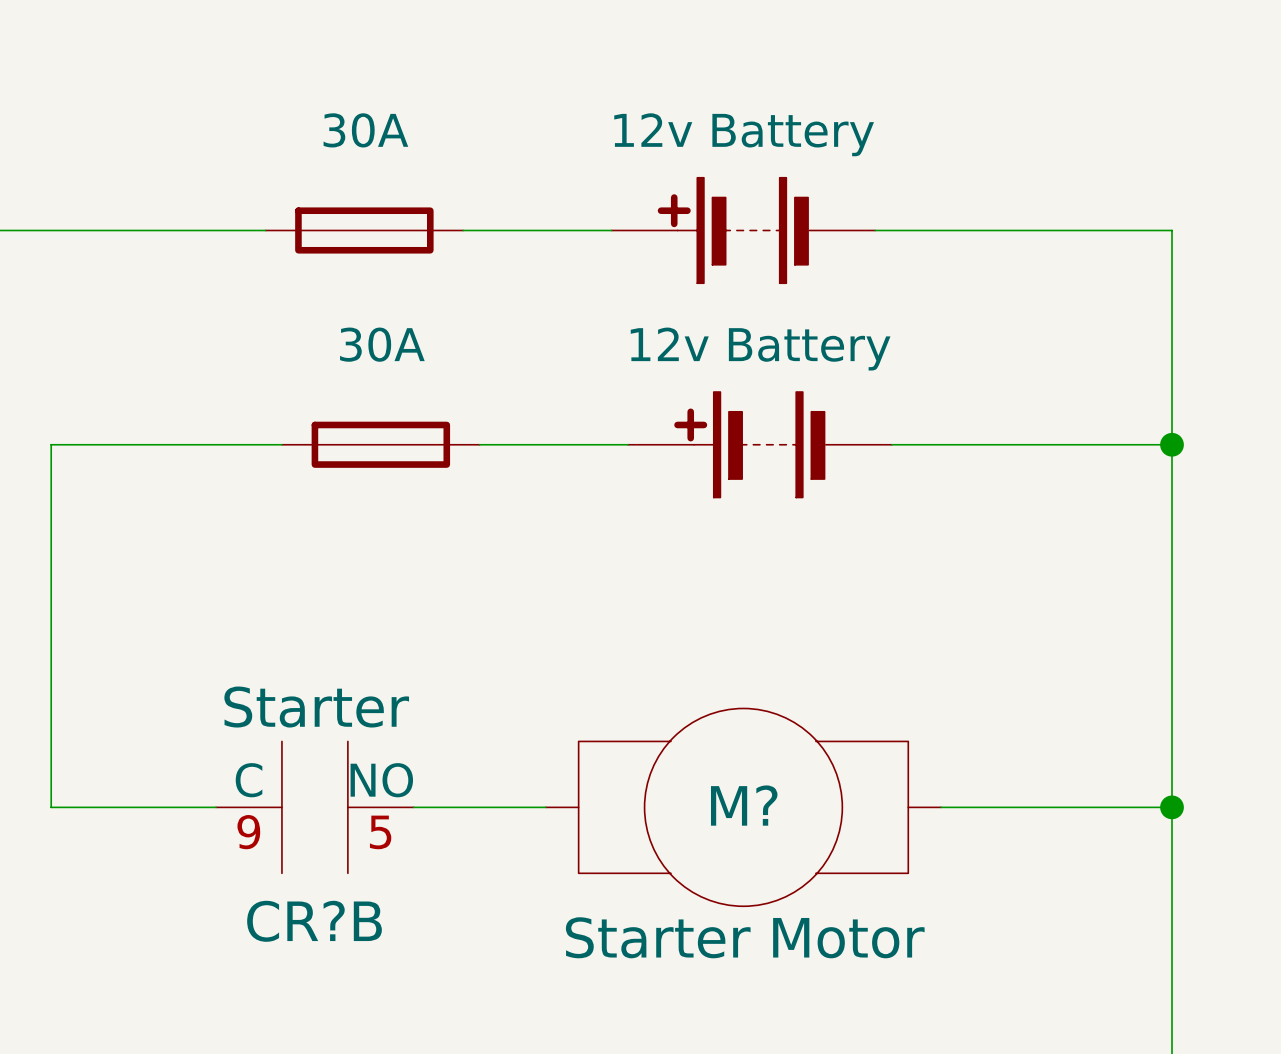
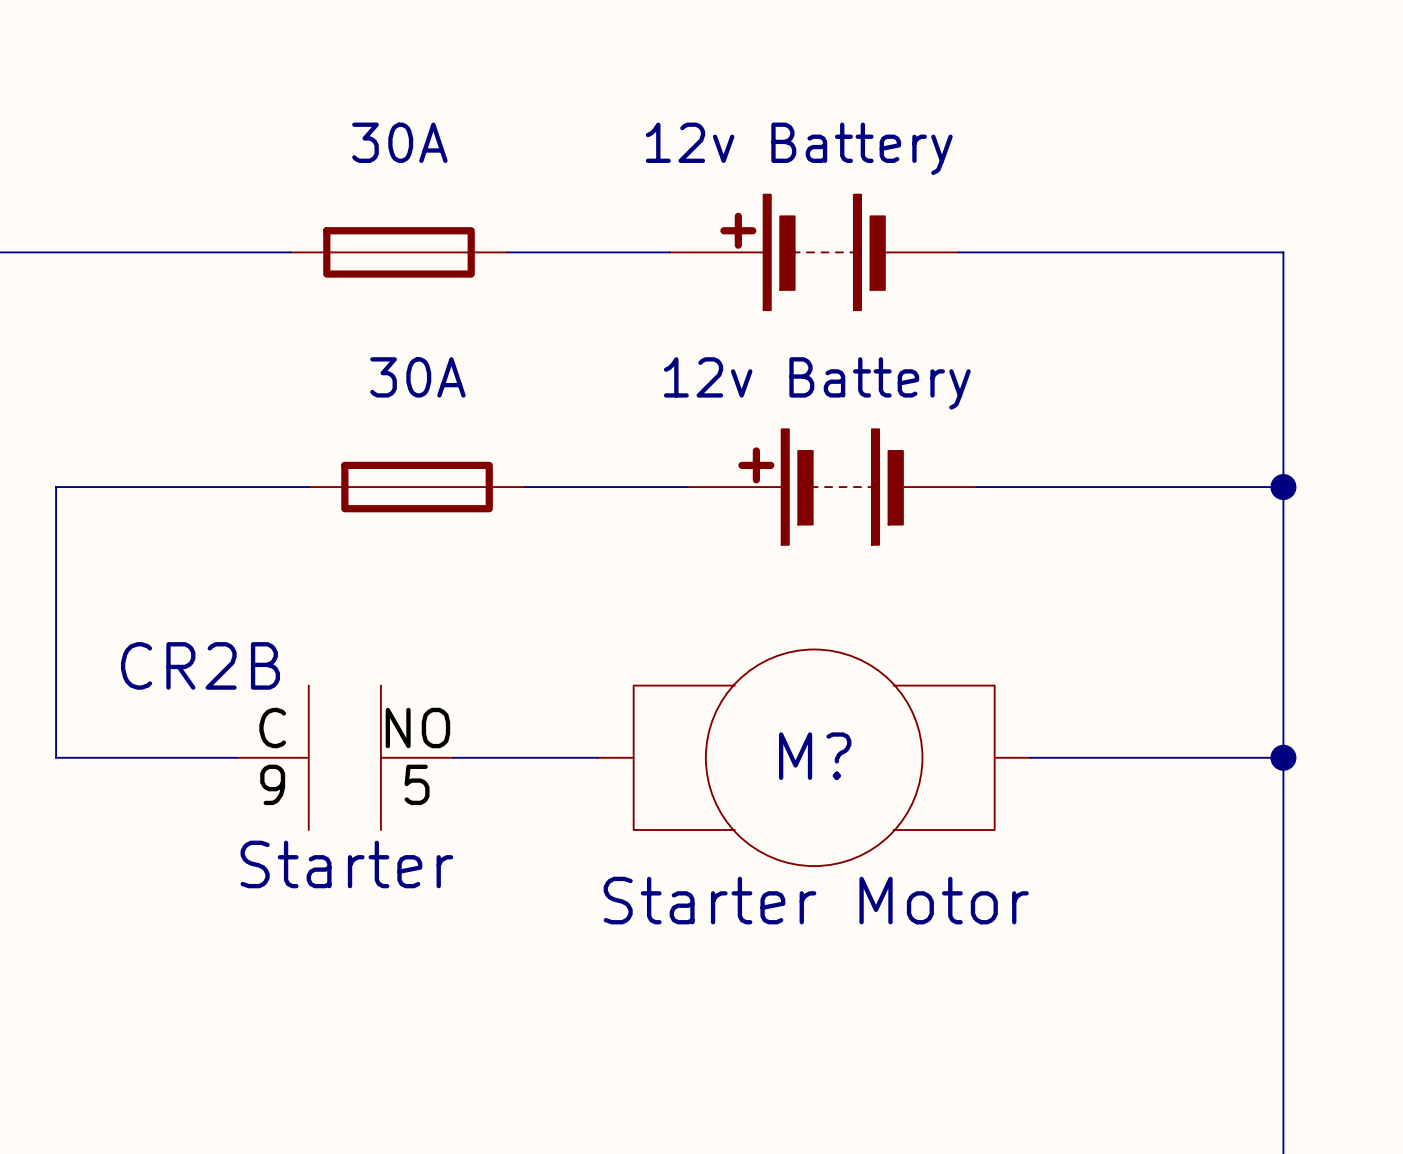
wire: (51, 691) (51, 807) (216, 807) -> (56, 757) (236, 757)
CR2B: none -> Starter (344, 757)
CR?B: Starter (314, 807) -> none
wire: (413, 807) (545, 807) -> (453, 757) (597, 757)
M? position: (743, 807) -> (814, 757)
wire: (941, 807) (1172, 807) -> (1030, 757) (1283, 757)
junction position: (1172, 807) -> (1283, 757)

